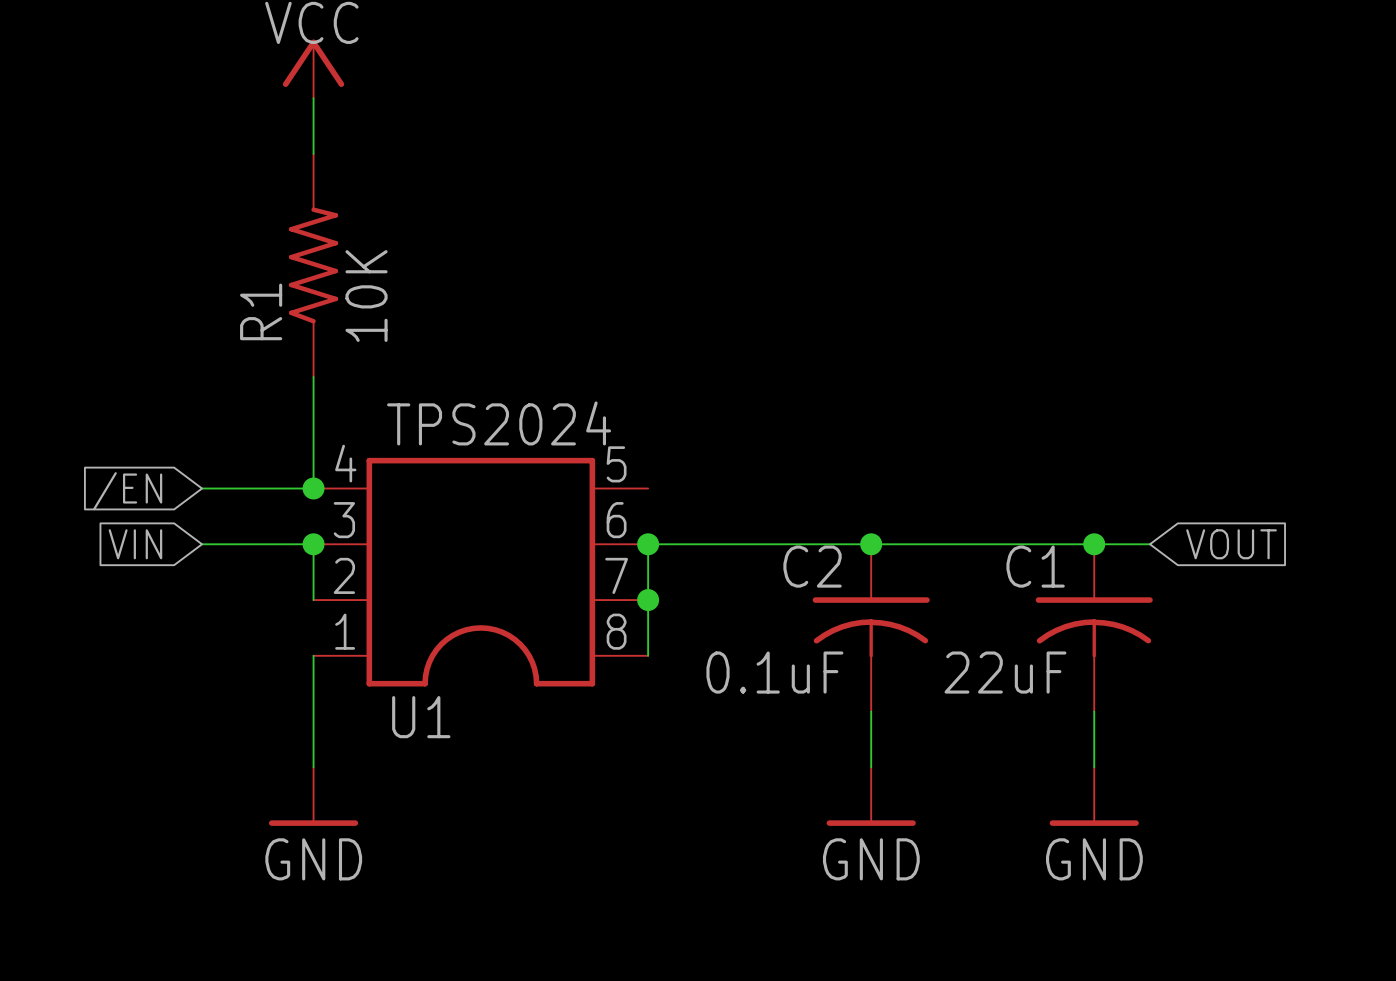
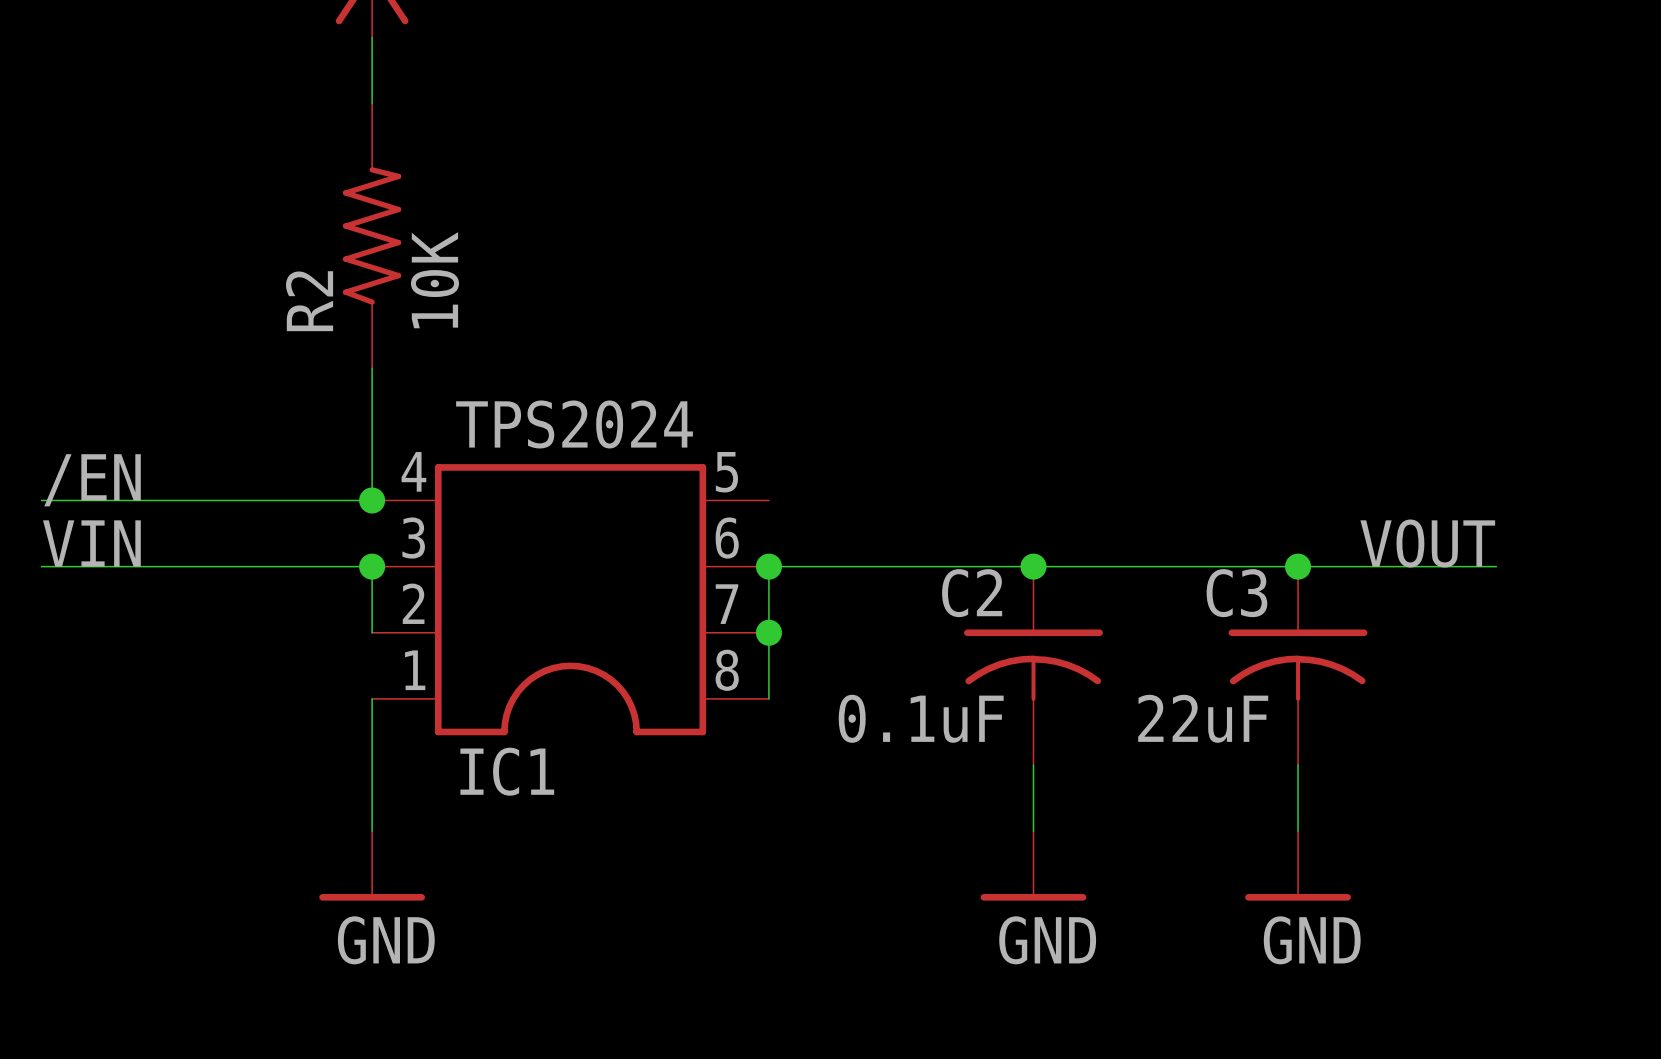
R1 name: R1 (261, 311) -> R2 (309, 301)
label: none -> /EN (92, 480)
wire: none -> (41, 500) (239, 500)
global label: /EN (127, 491) -> none
label: none -> VIN (91, 543)
label: none -> VOUT (1427, 543)
wire: none -> (41, 566) (239, 566)
global label: VIN (135, 544) -> none
wire: none -> (1364, 566) (1496, 566)
global label: VOUT (1231, 544) -> none
C1 name: C1 (1035, 566) -> C3 (1236, 593)
U1 name: U1 (421, 717) -> IC1 (507, 771)

